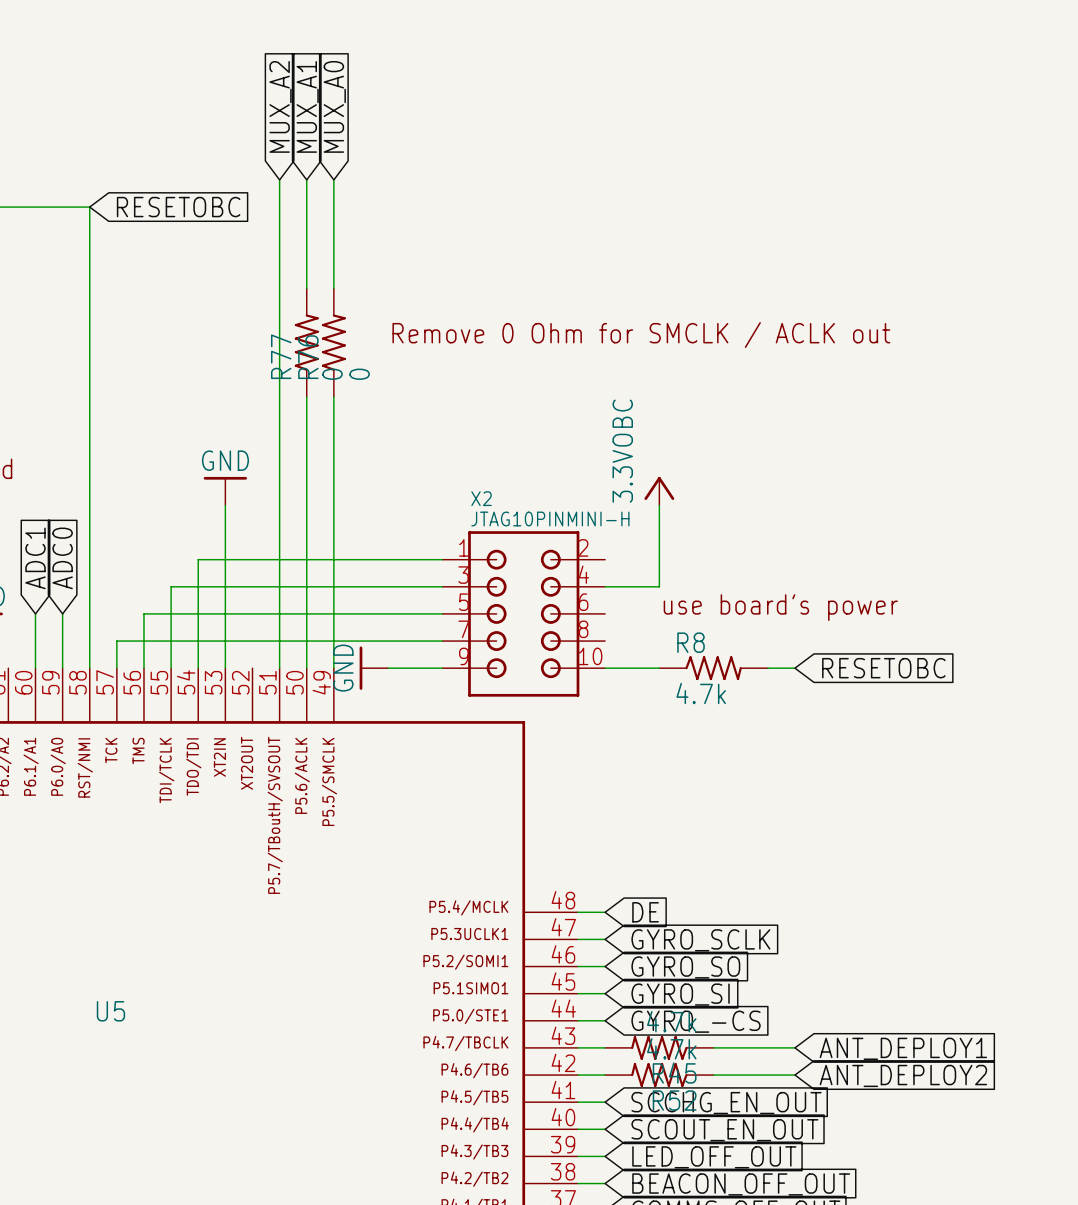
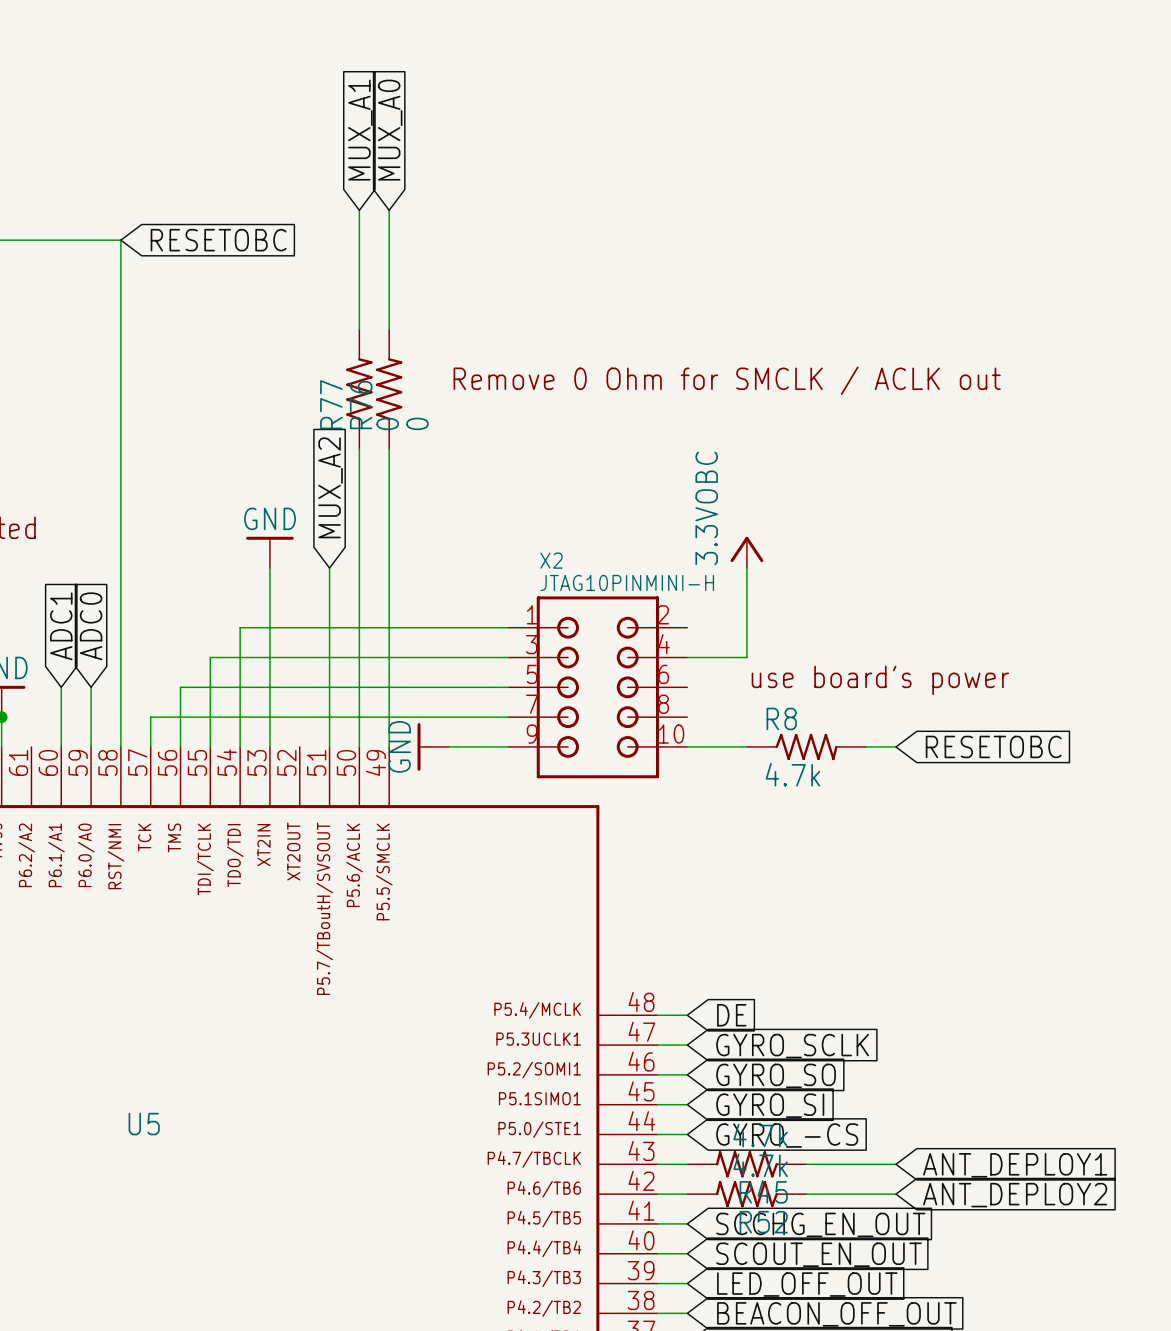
global label: MUX_A2 (280, 106) -> none
wire: (279, 179) (279, 505) -> none
global label: none -> MUX_A2 (330, 487)

